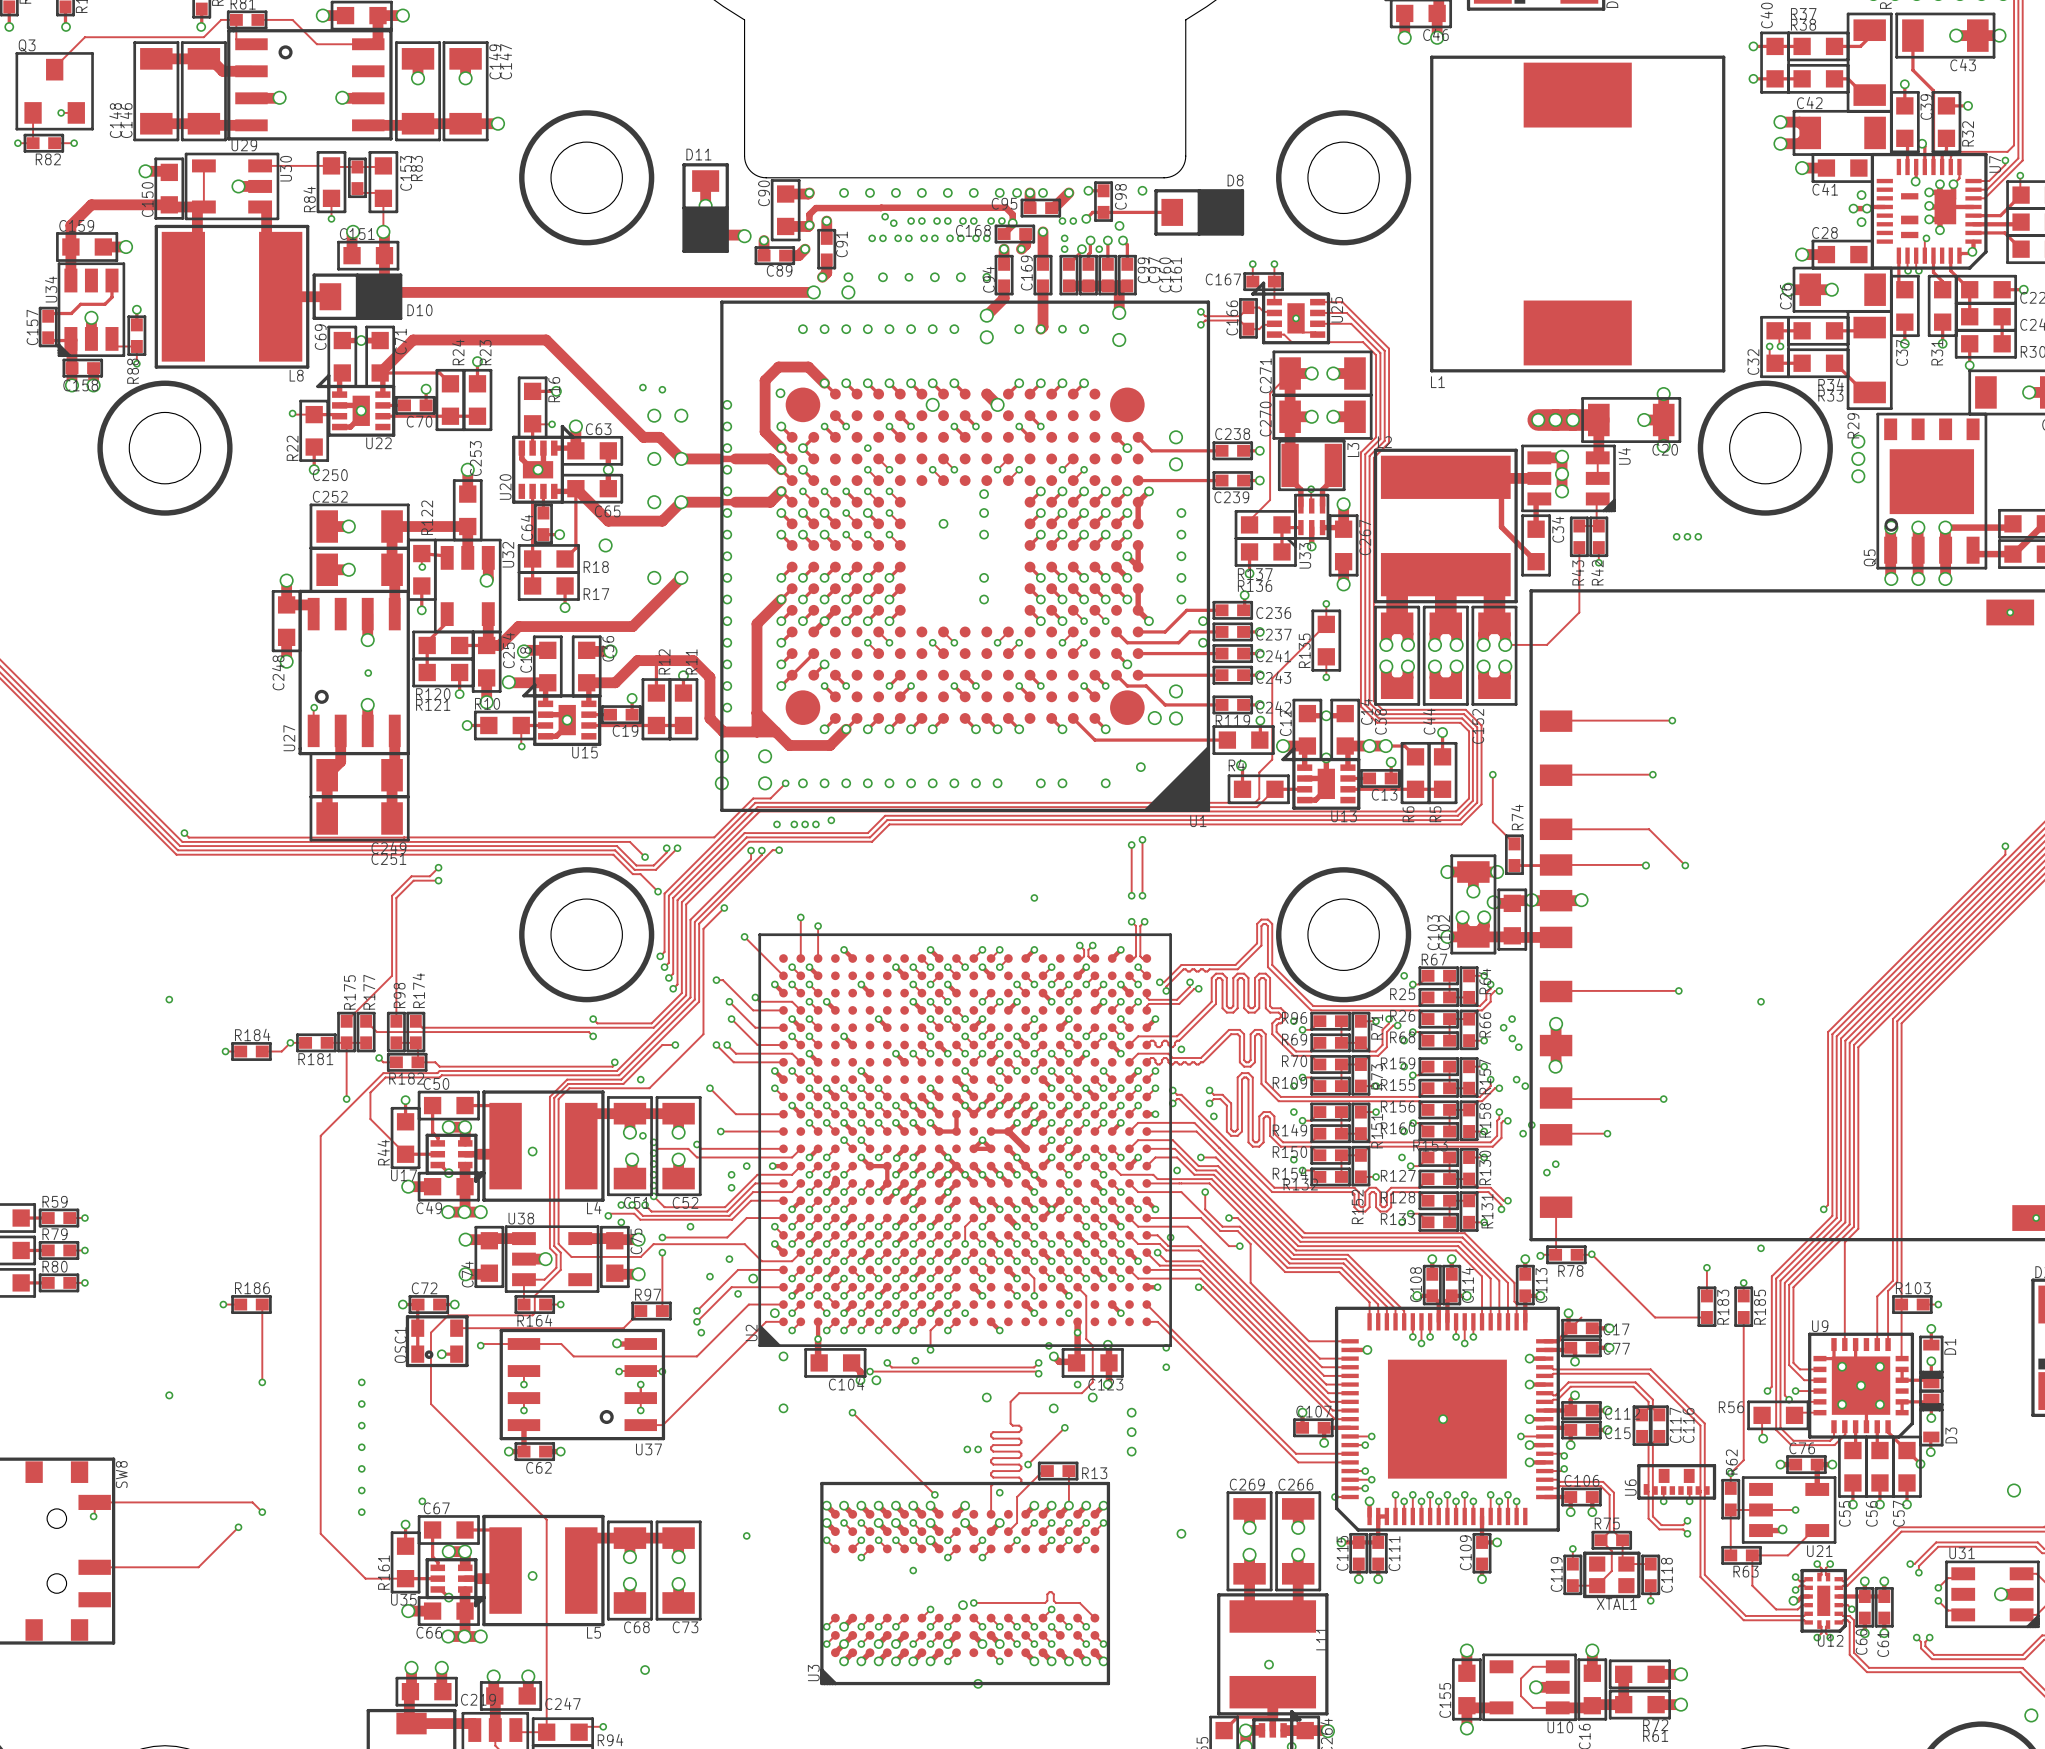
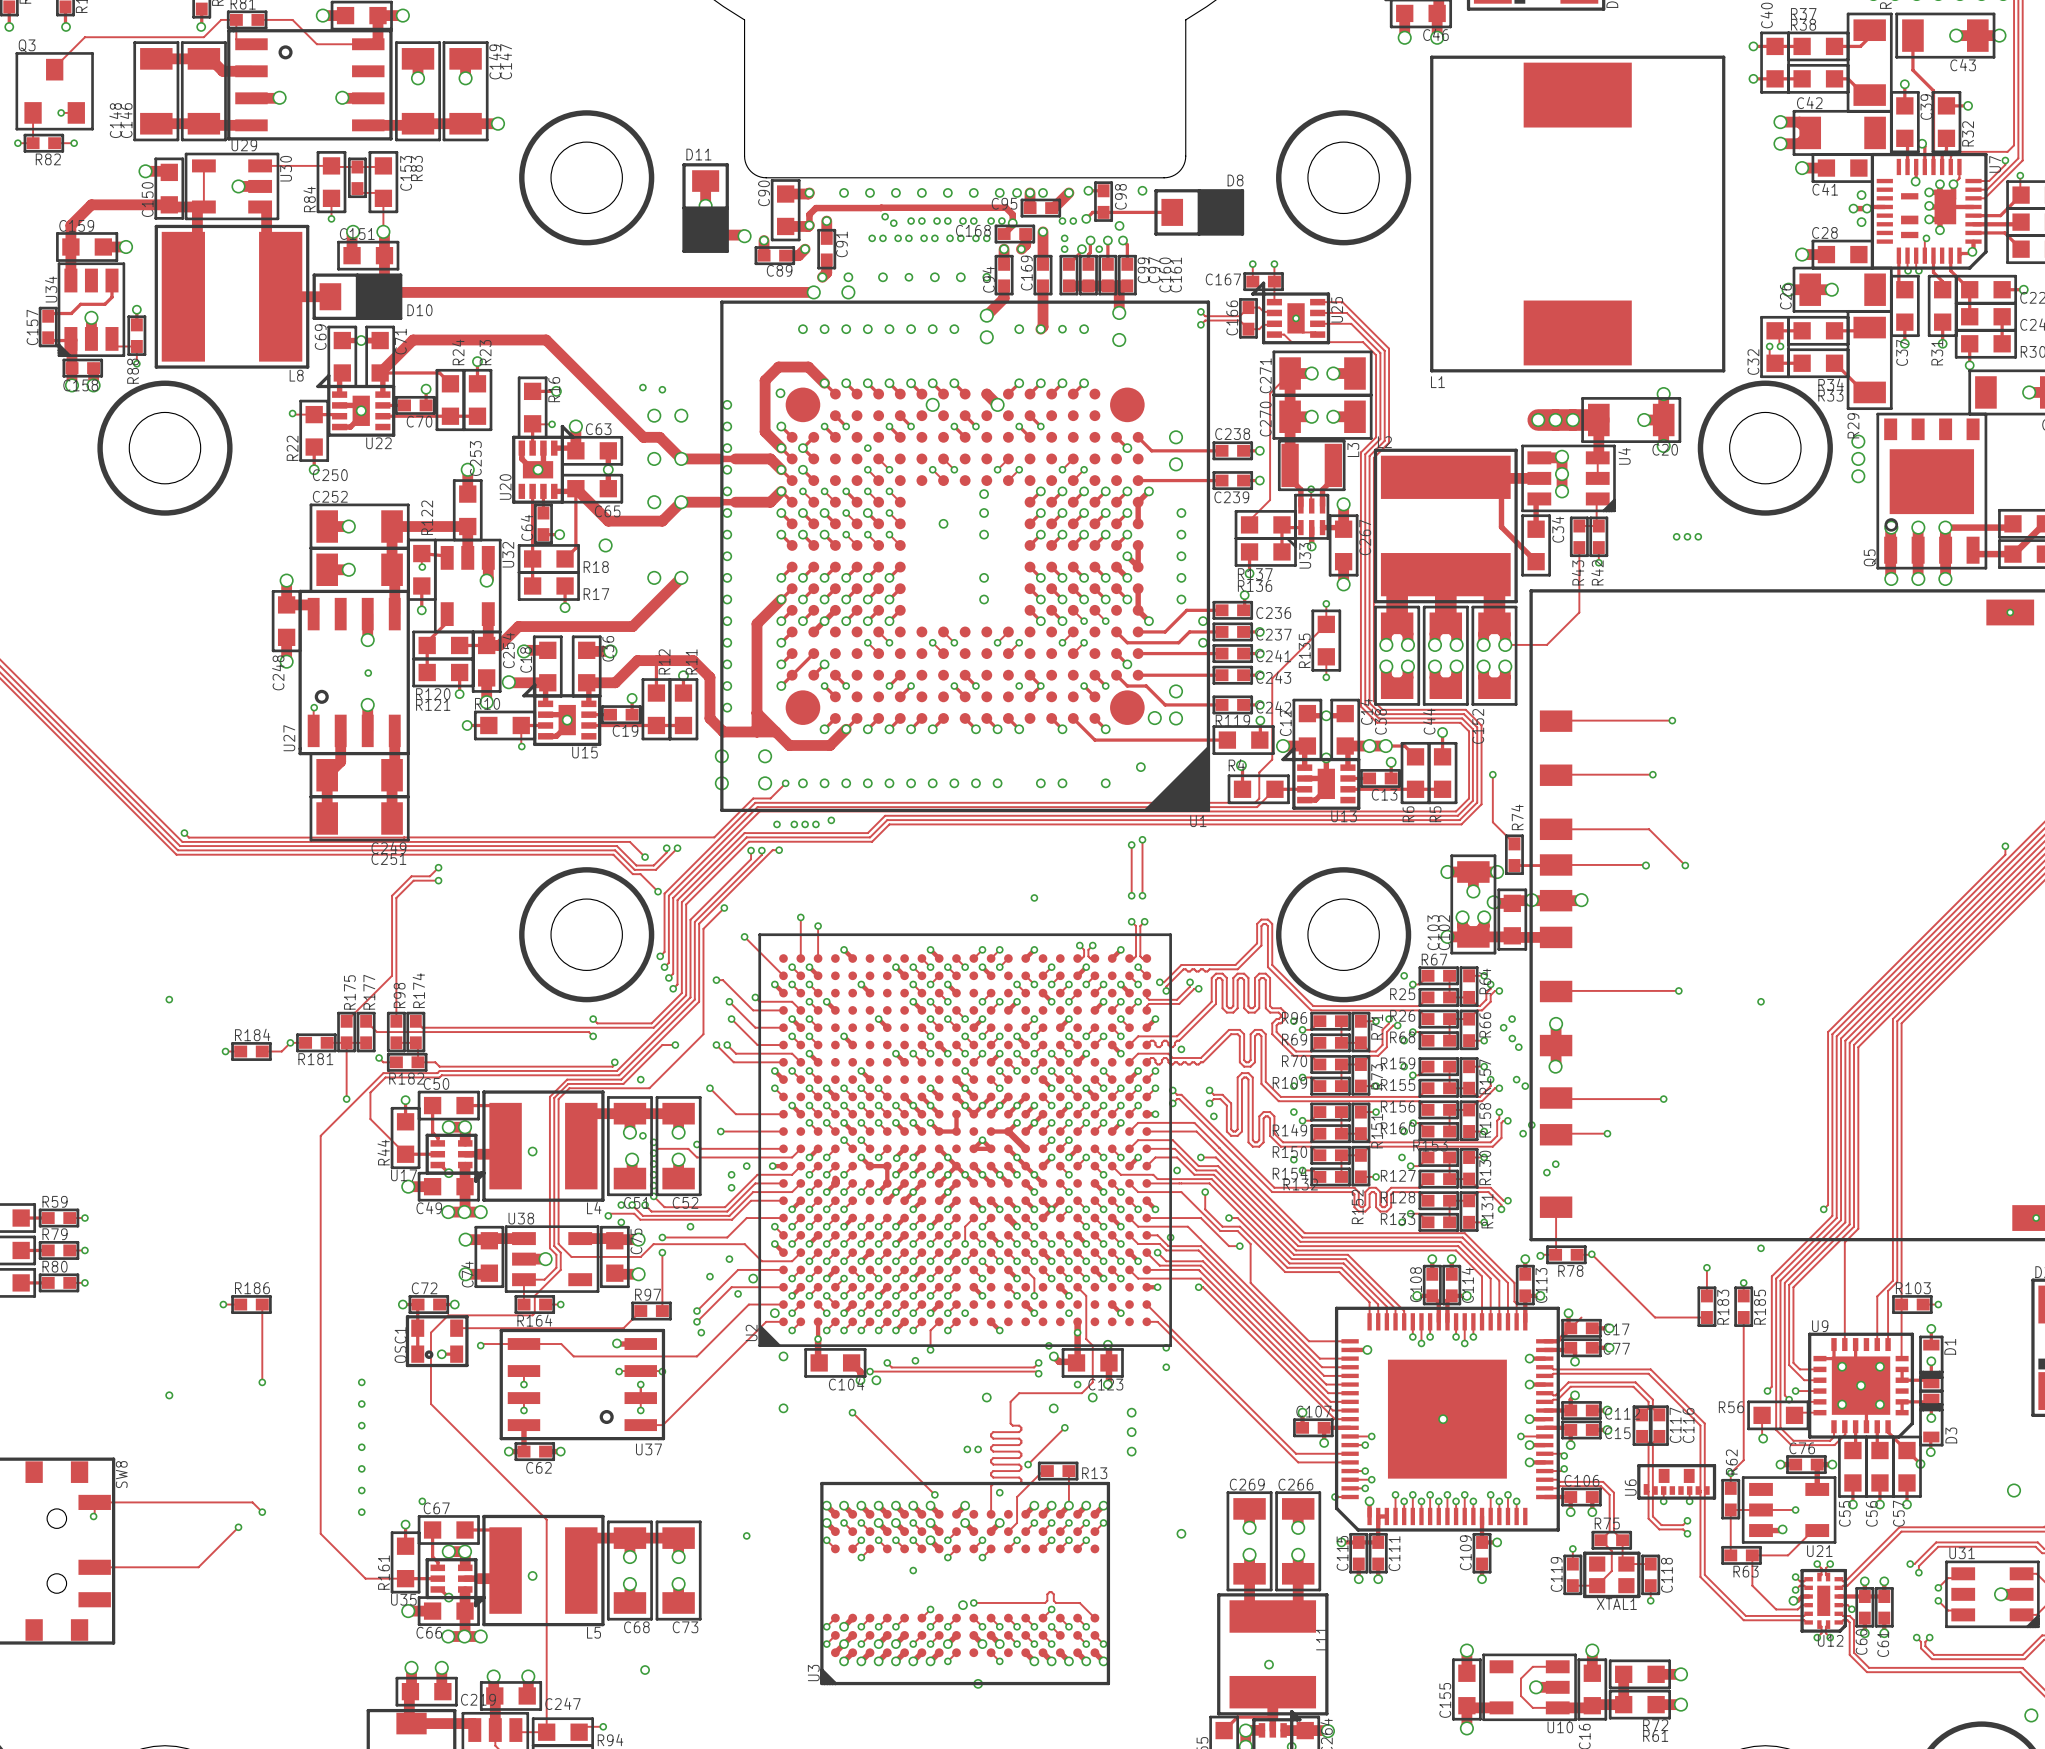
track: (1019, 686) (1030, 696) -> (1040, 686) (1030, 696)

